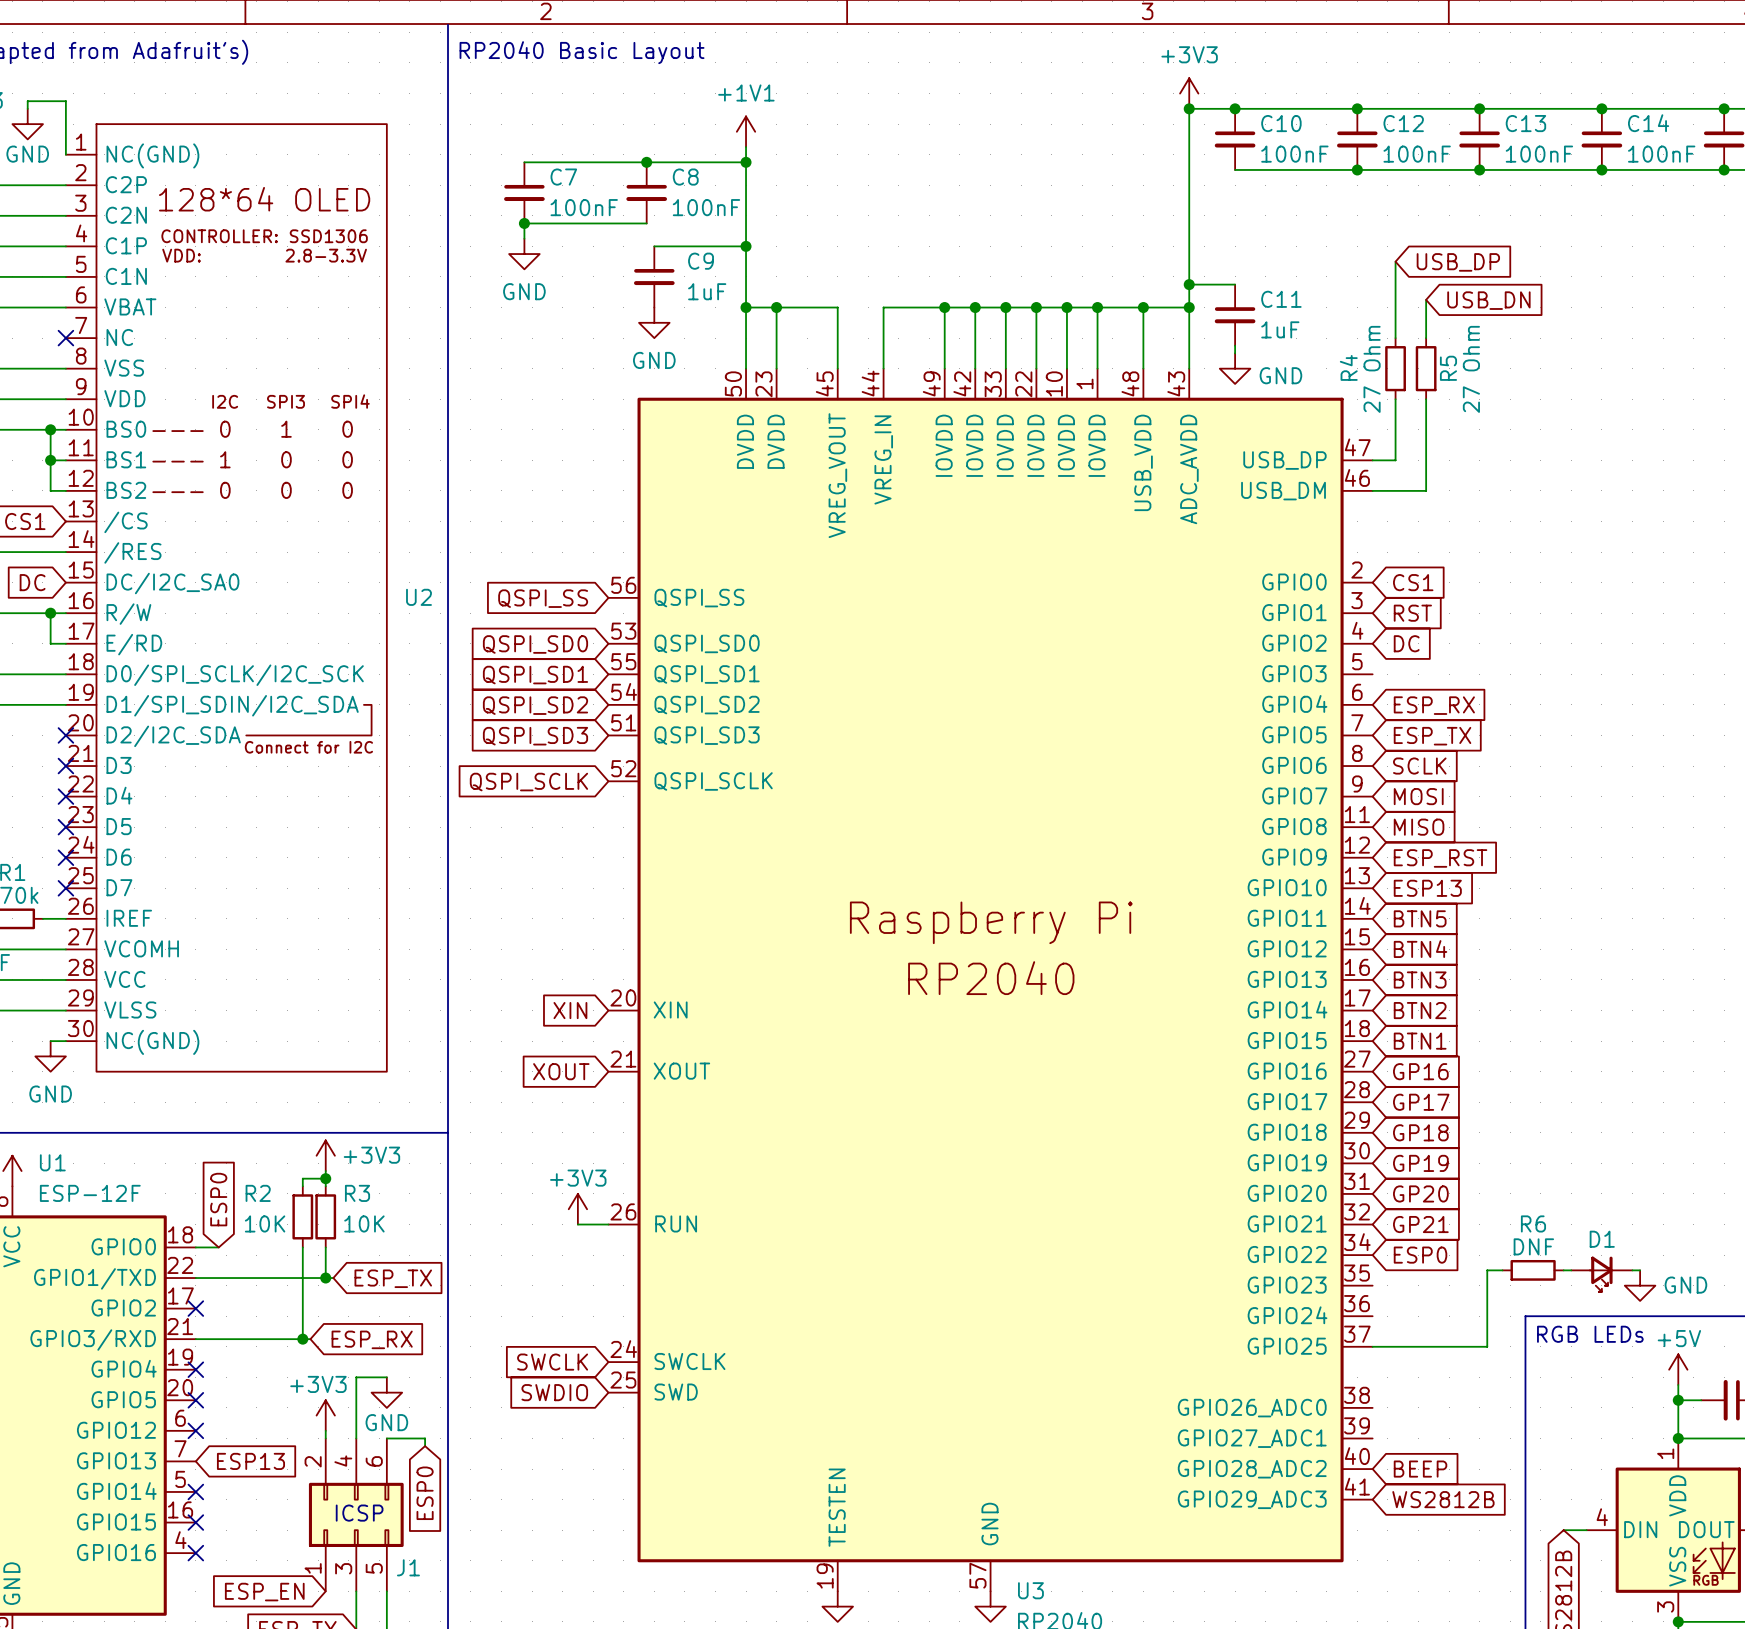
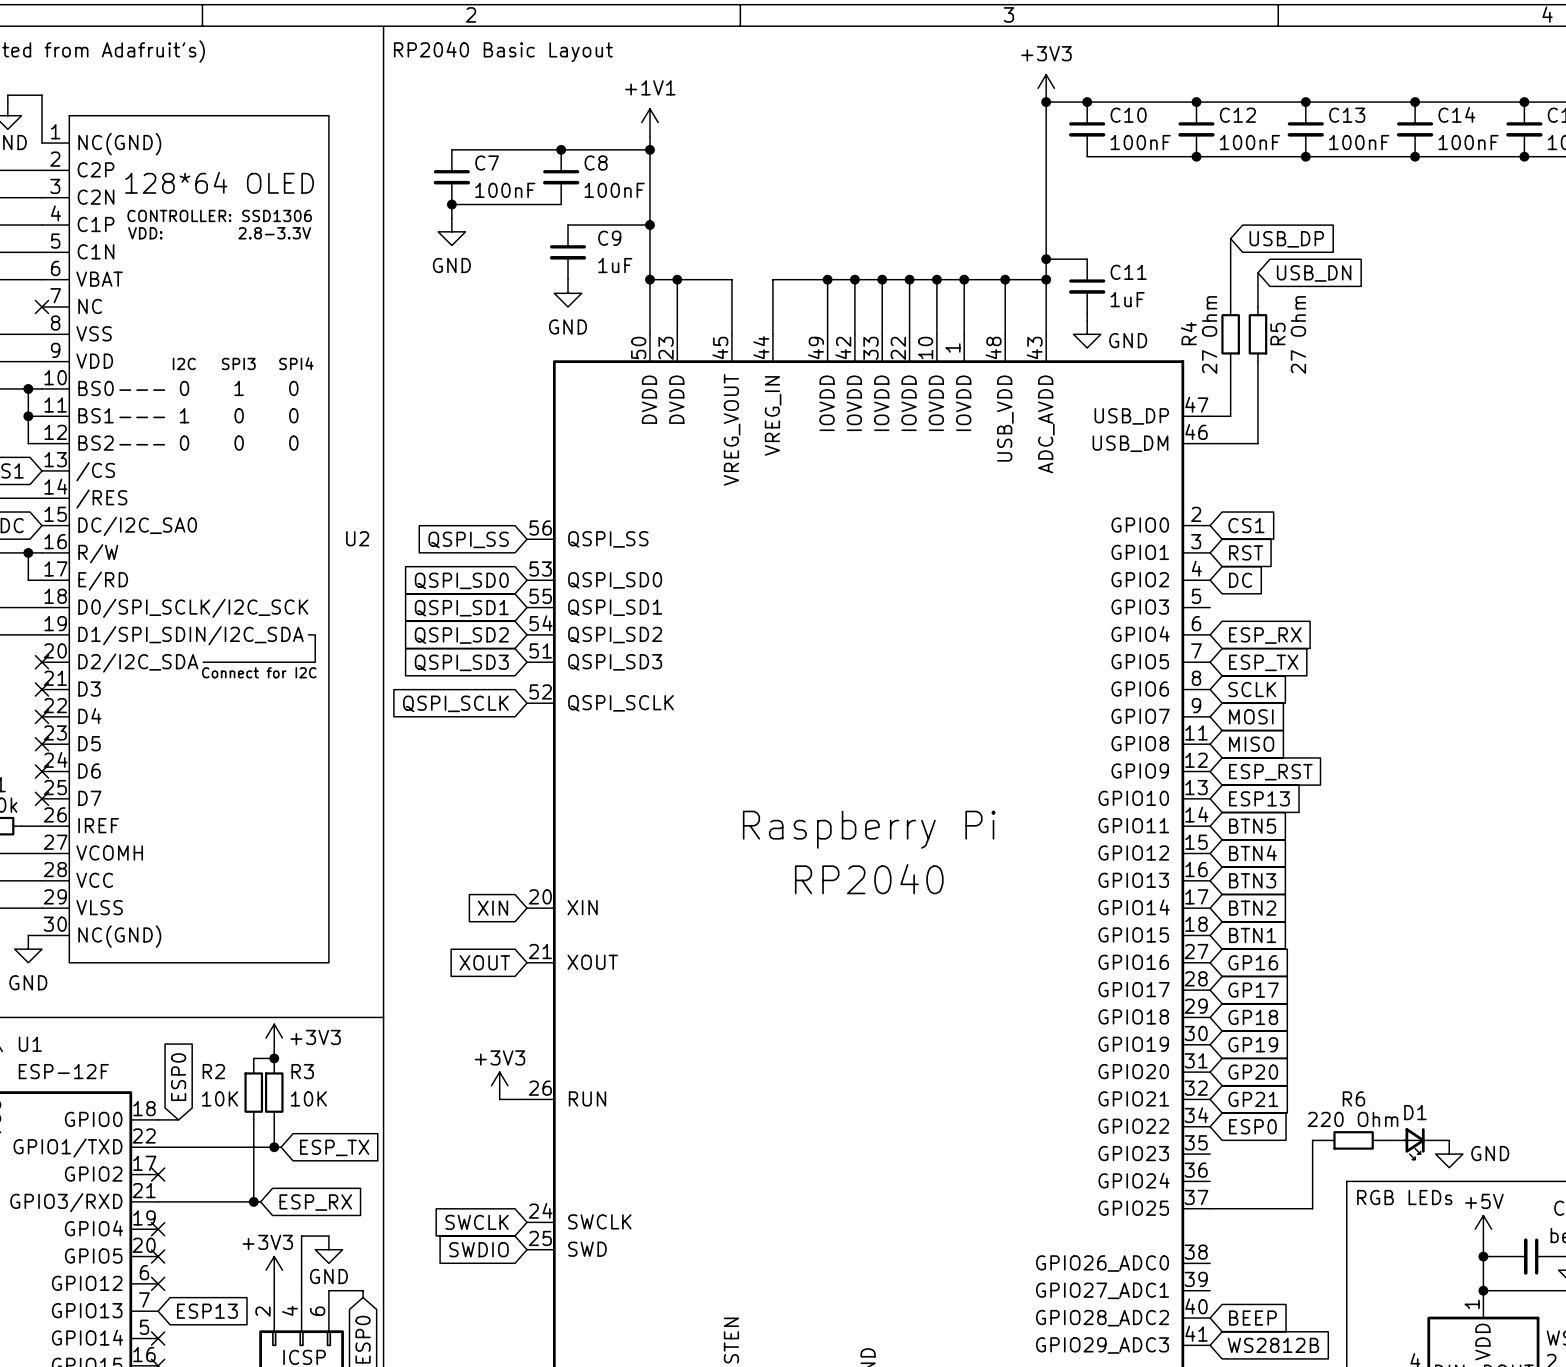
R6 value: DNF (1533, 1246) -> 220 Ohm (1352, 1119)

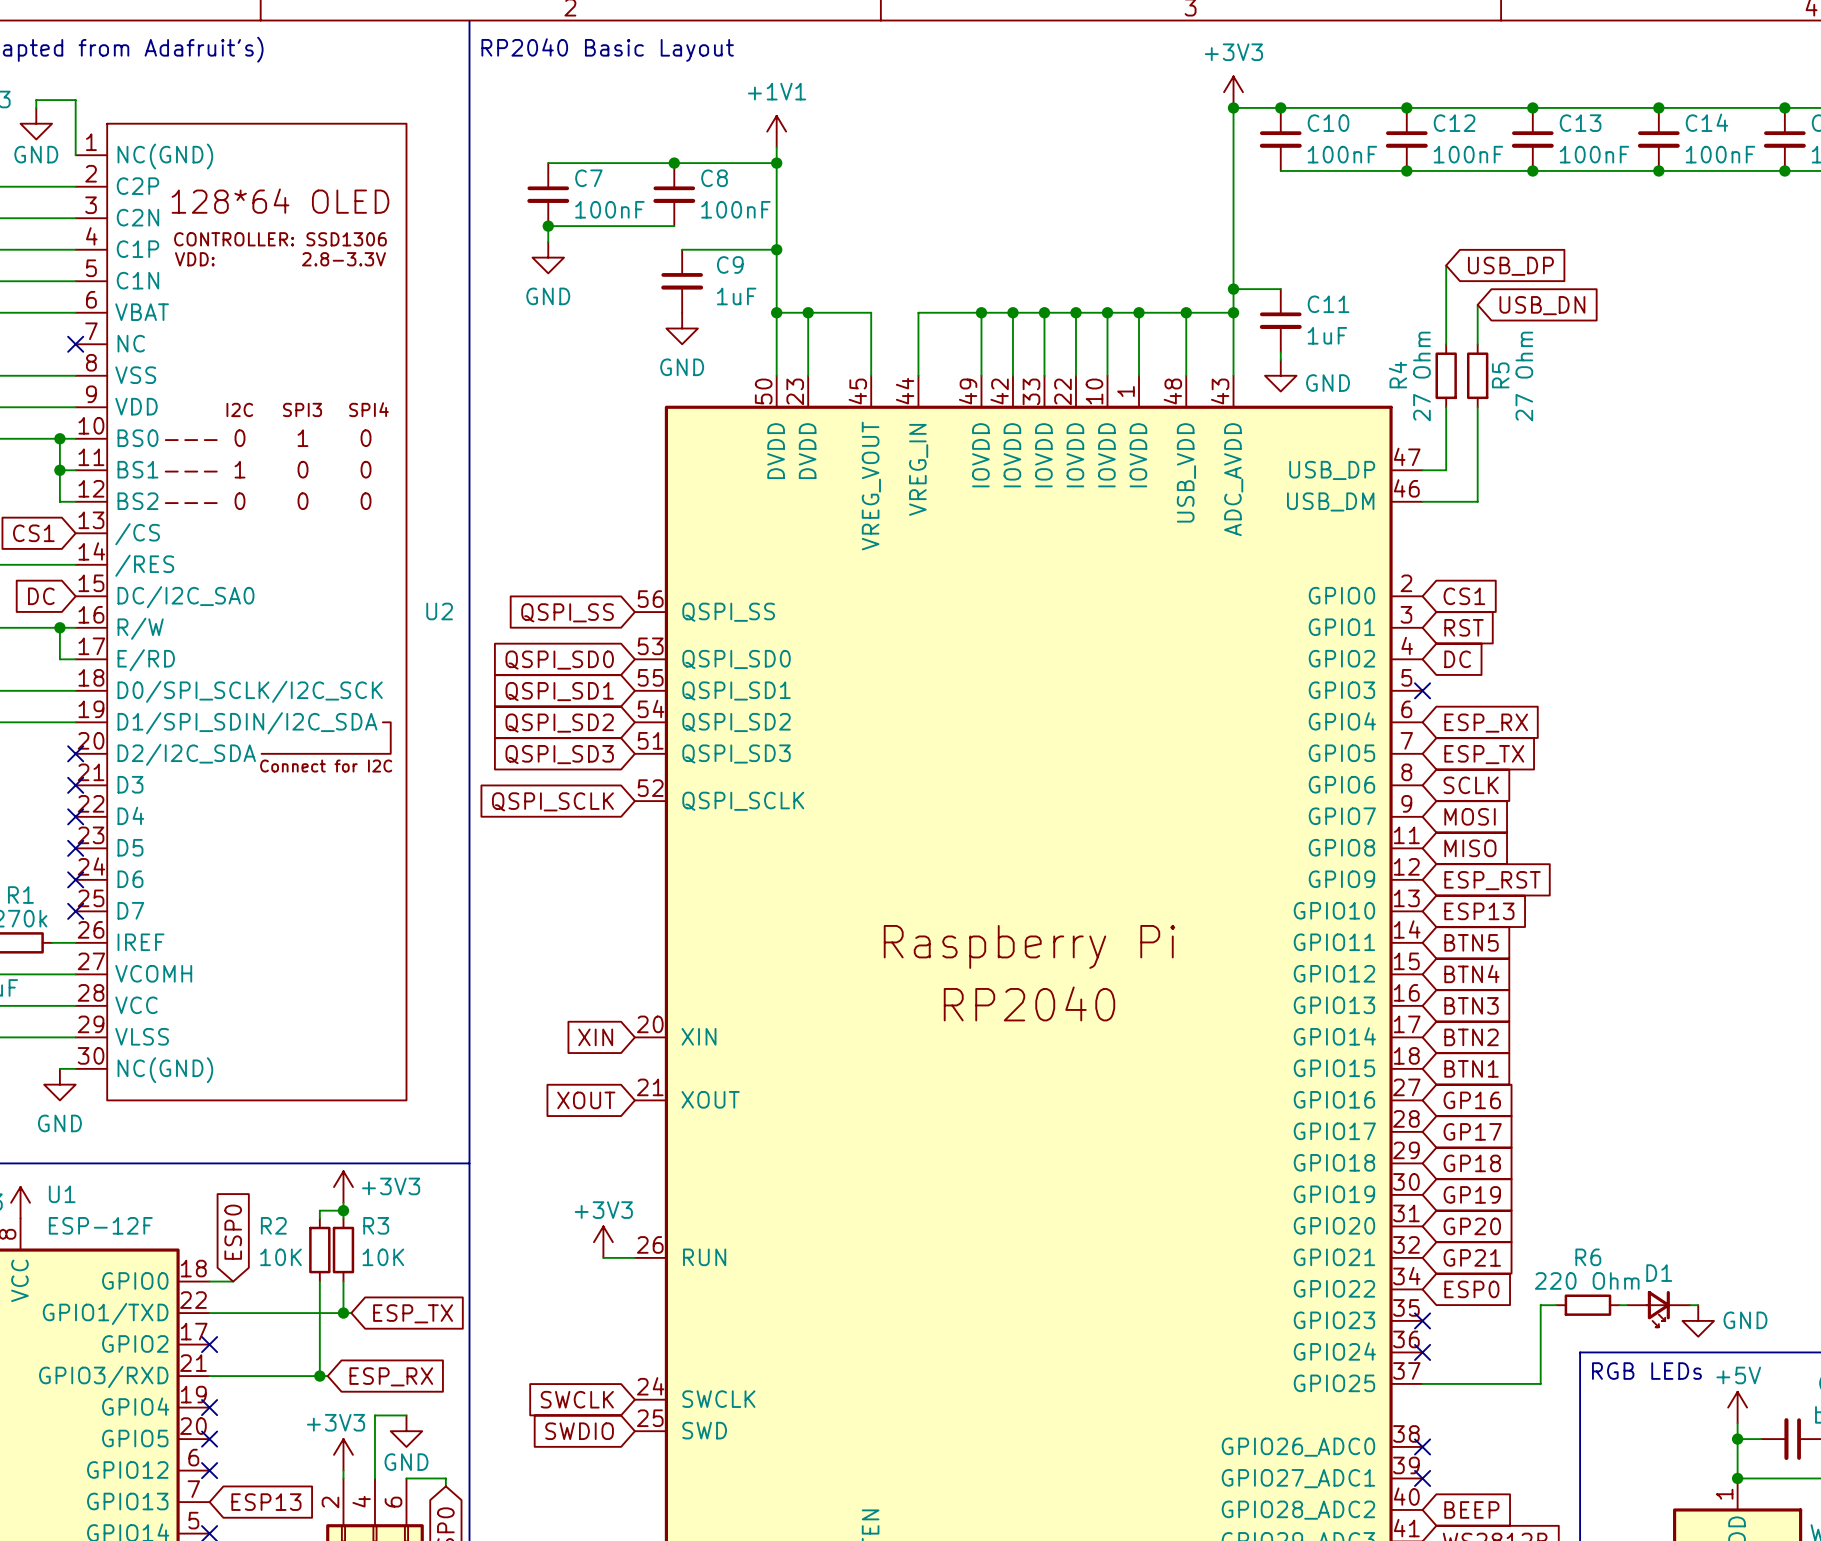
no-connect mark: none -> (1422, 690)
no-connect mark: none -> (1422, 1320)
no-connect mark: none -> (1422, 1352)
no-connect mark: none -> (1422, 1446)
no-connect mark: none -> (1422, 1478)

